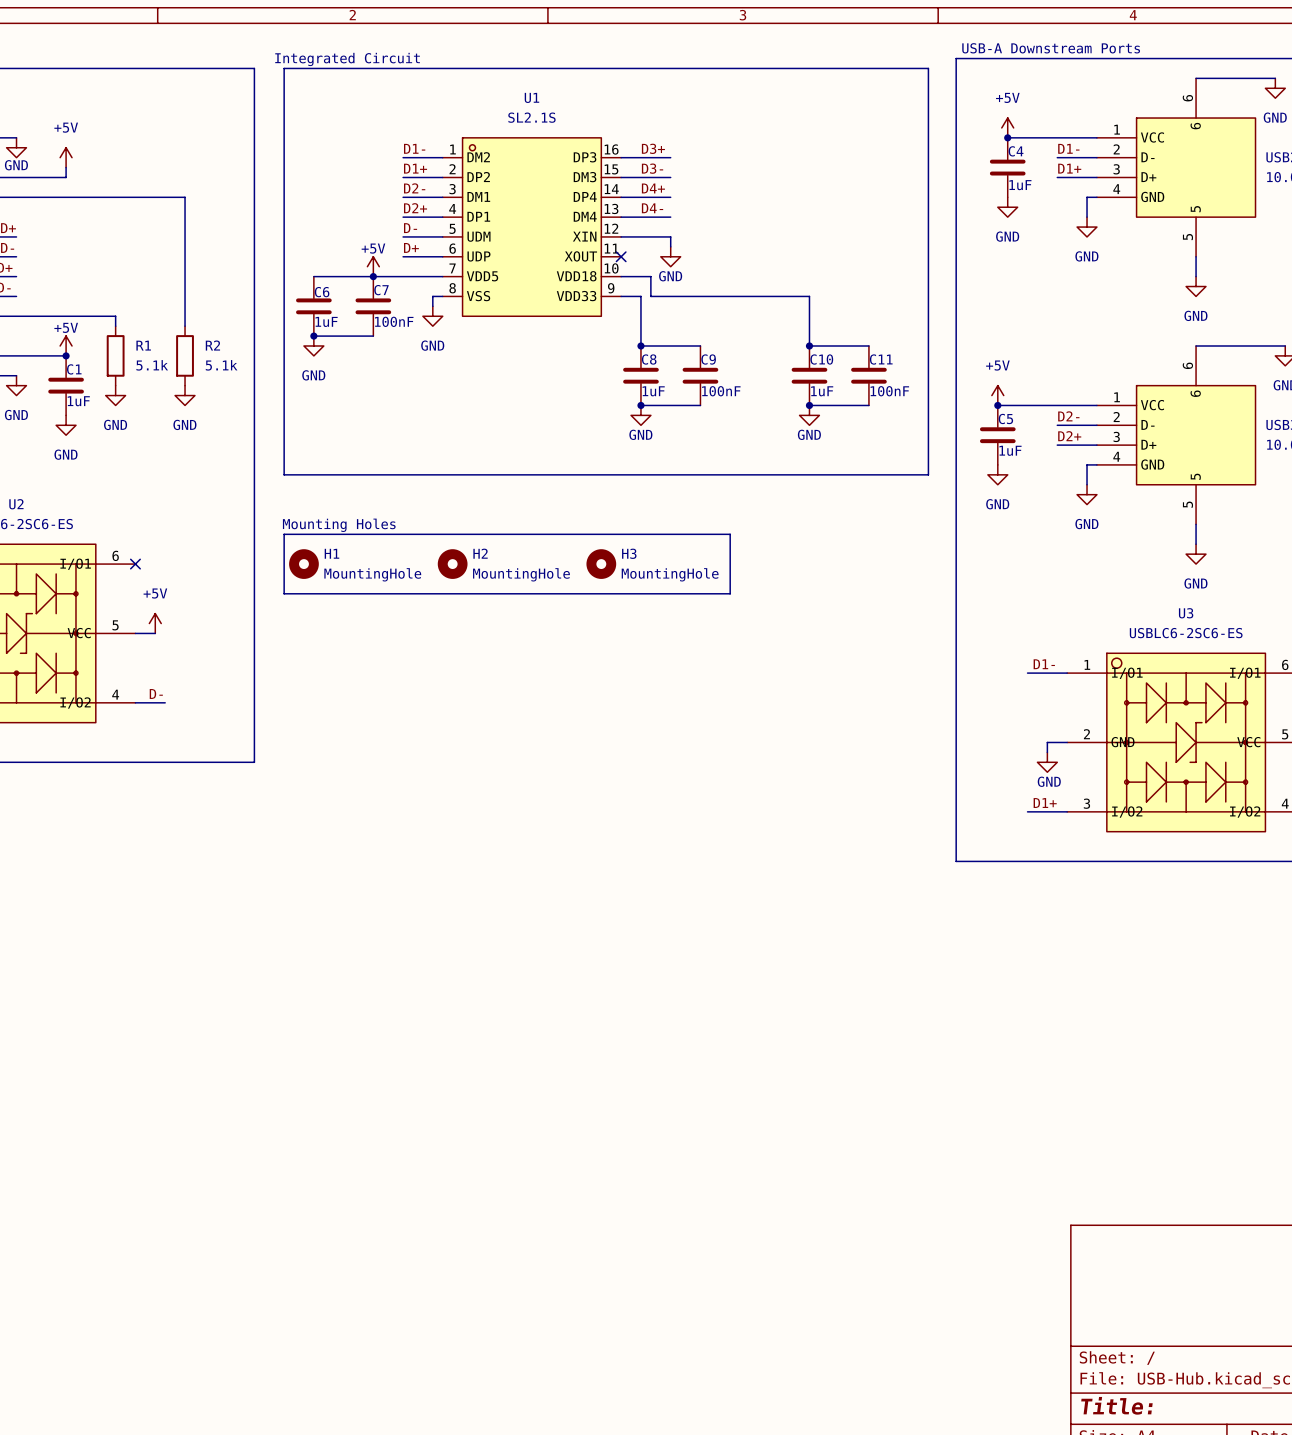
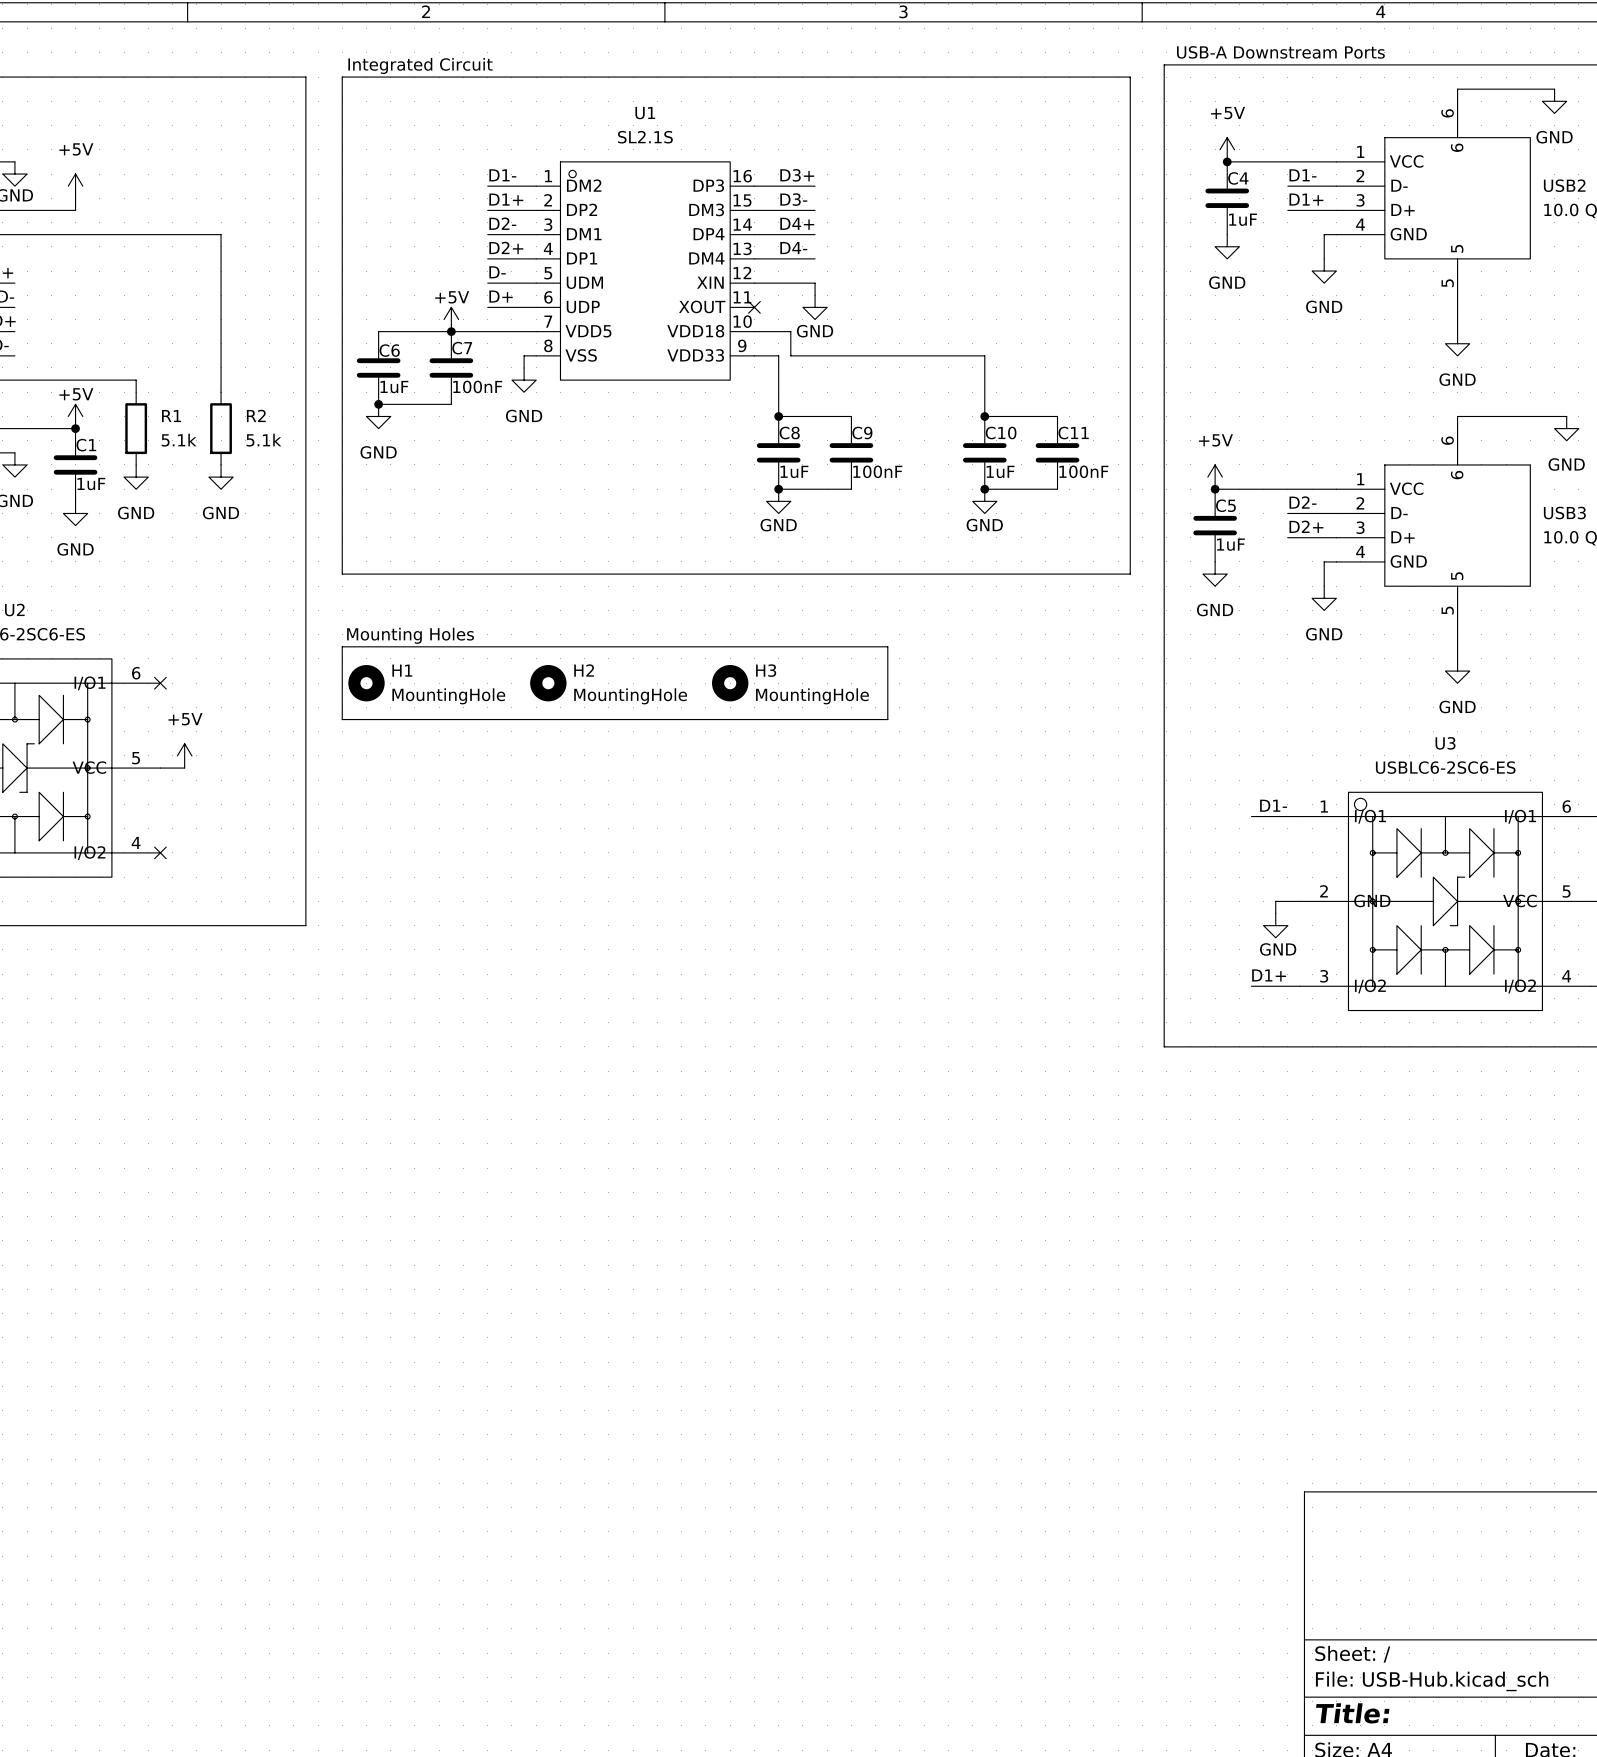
label: D- (156, 693) -> none
wire: (135, 702) (165, 702) -> none
no-connect mark: none -> (160, 852)

